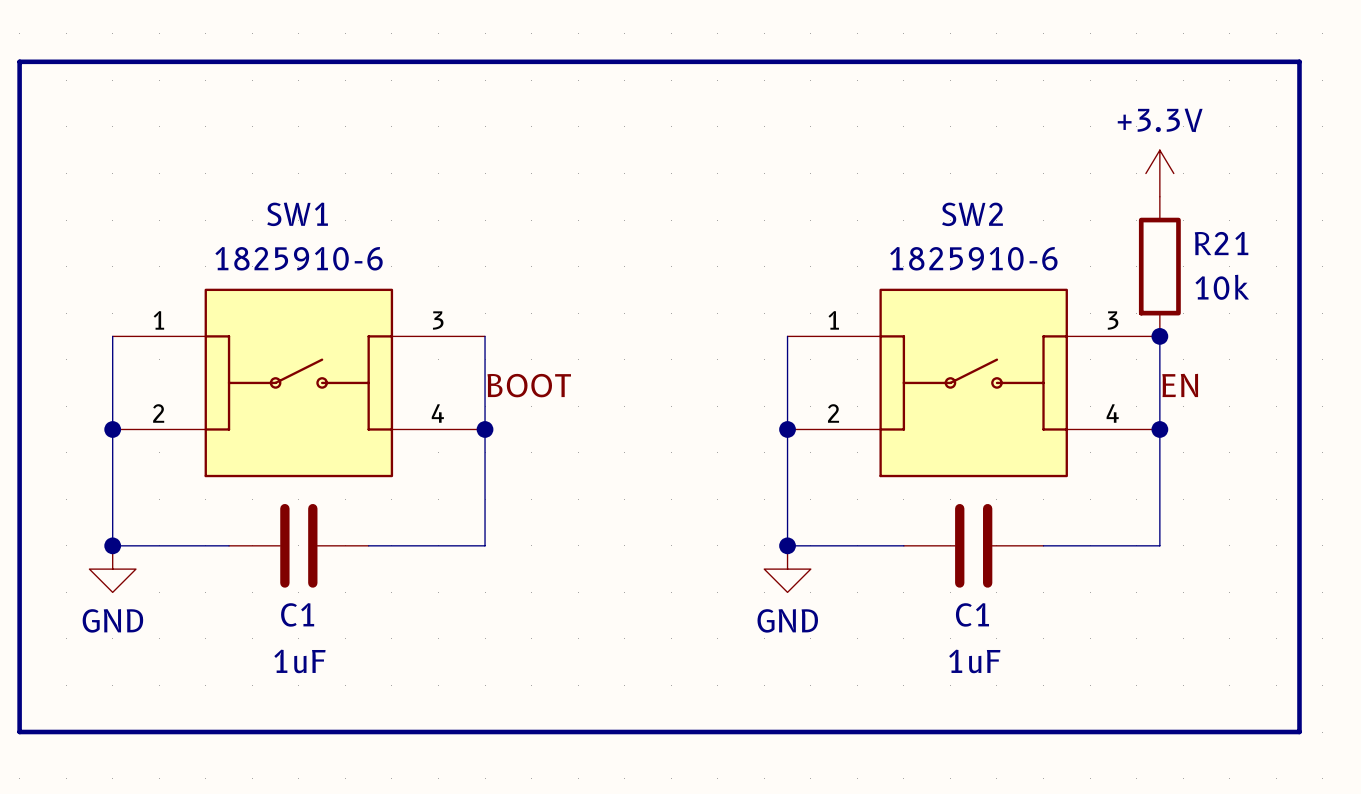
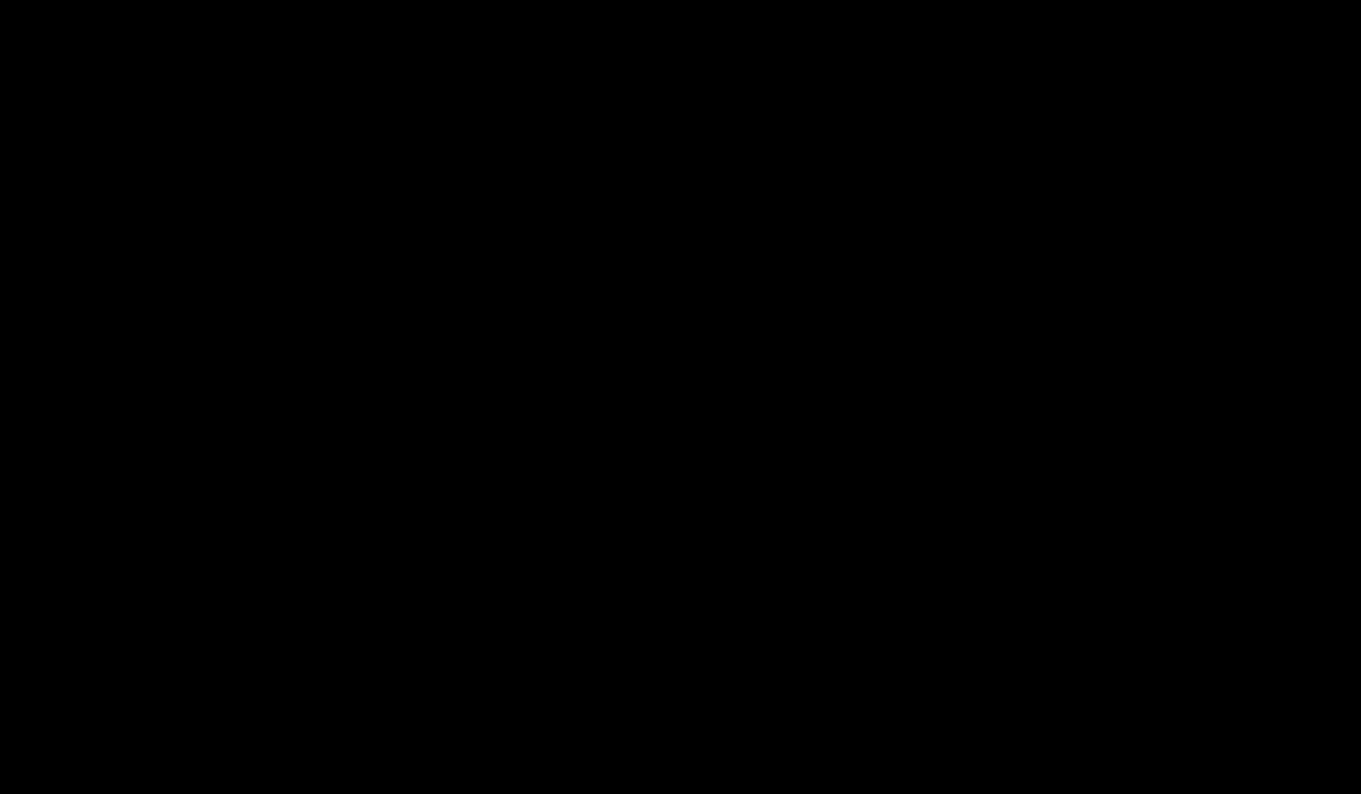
line: (19, 61) (1299, 61) (1299, 732) (19, 732) (19, 61) -> none
power symbol: +3.3V (1159, 173) -> none
R21: 10k (1159, 266) -> none
wire: (112, 336) (112, 545) (229, 545) -> none
wire: (485, 336) (485, 545) (368, 545) -> none
wire: (787, 336) (787, 545) (903, 545) -> none
wire: (1159, 336) (1159, 545) (1043, 545) -> none
junction: (1159, 336) -> none
SW1: 1825910-6 (298, 382) -> none
SW2: 1825910-6 (973, 382) -> none
label: BOOT (529, 385) -> none
label: EN (1180, 385) -> none
junction: (112, 429) -> none
junction: (485, 429) -> none
junction: (787, 429) -> none
junction: (1159, 429) -> none
junction: (112, 545) -> none
C1: 1uF (298, 545) -> none
junction: (787, 545) -> none
C1: 1uF (973, 545) -> none
power symbol: GND (112, 569) -> none
power symbol: GND (787, 569) -> none

